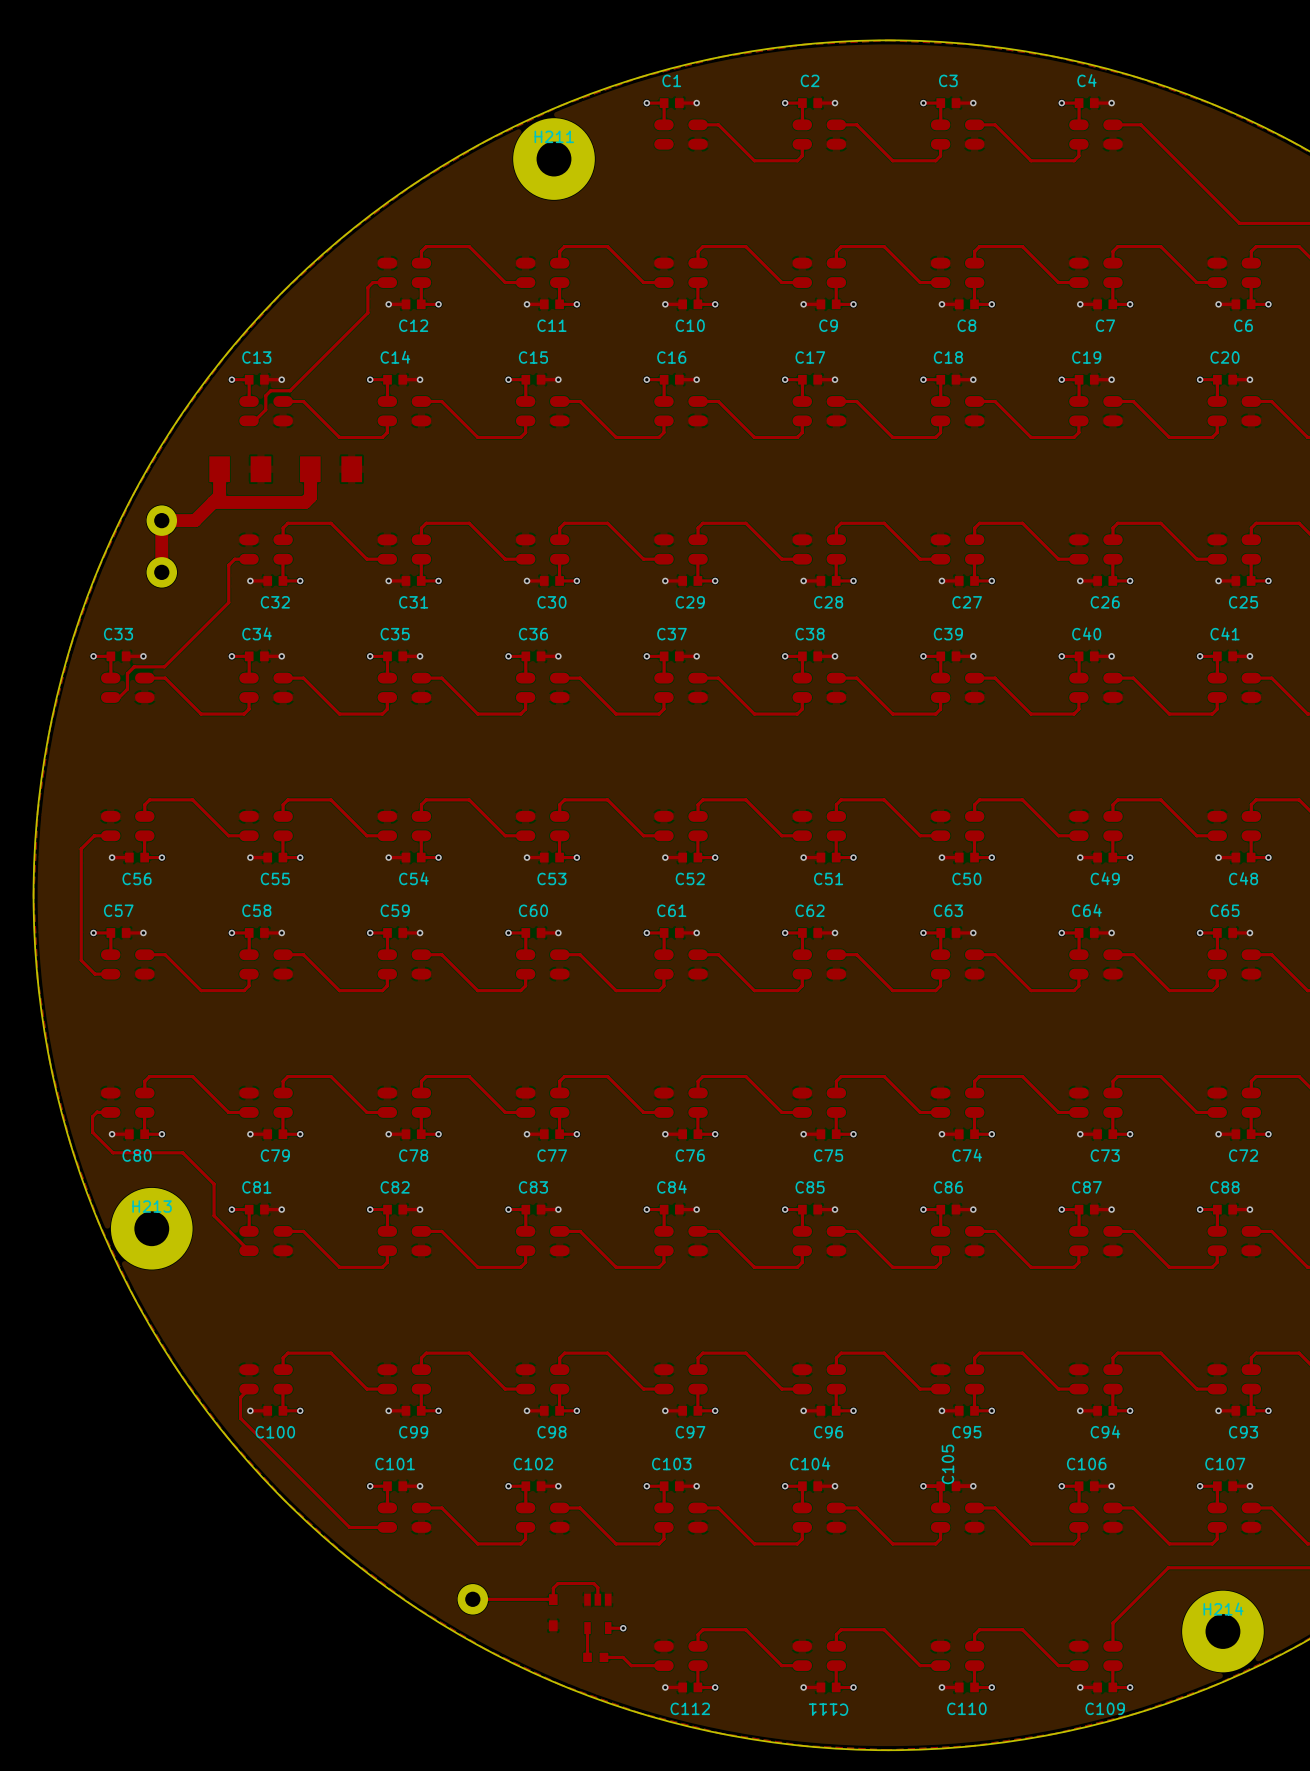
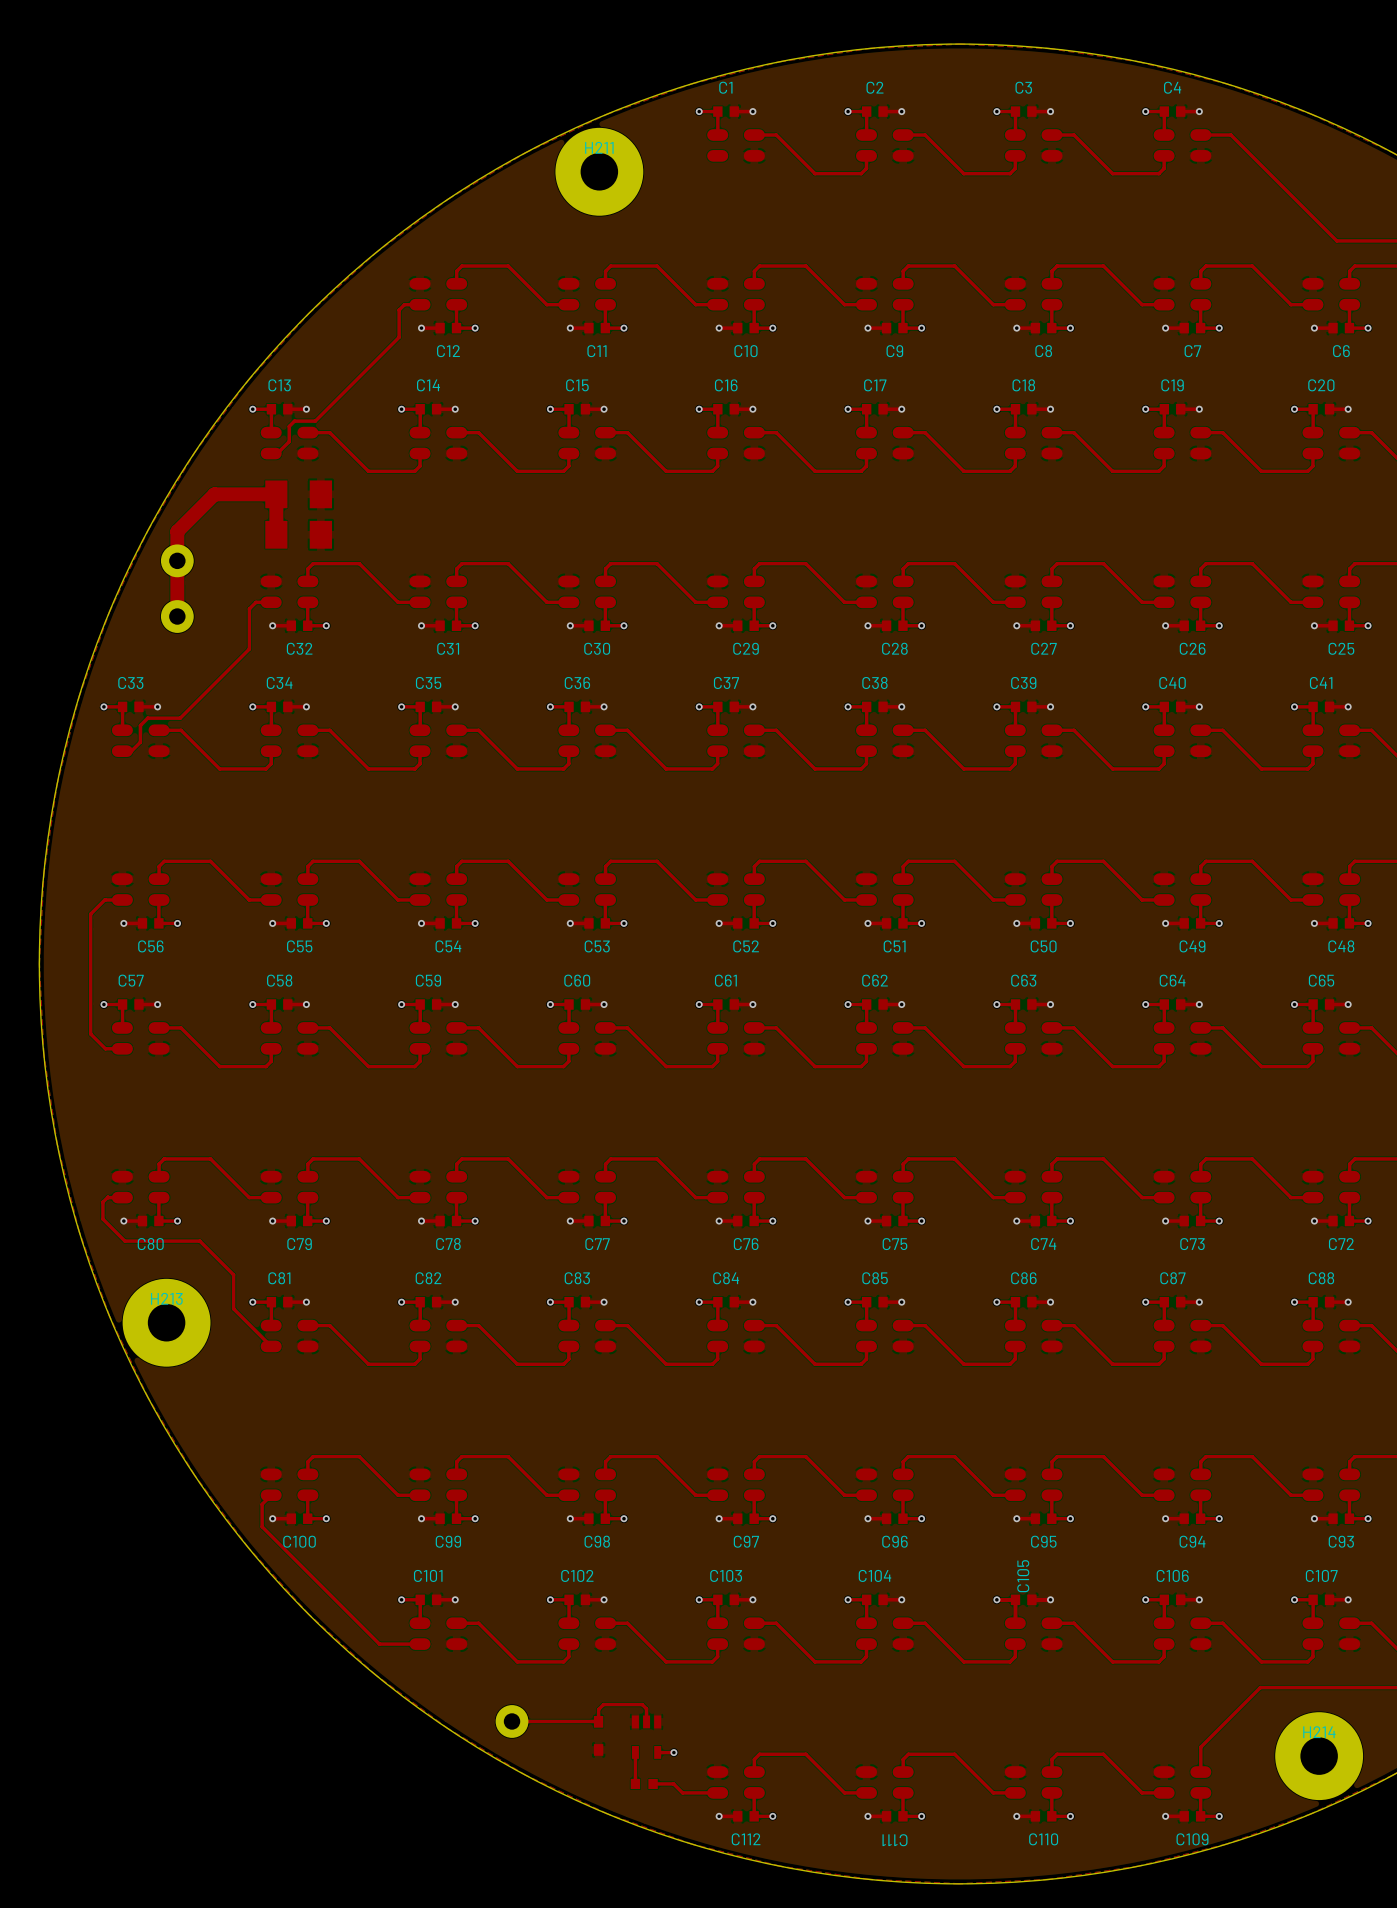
part: none -> (298, 494)
top track: (219, 469) (219, 496) (195, 520) (161, 520) -> (276, 534) (276, 494) (214, 494) (177, 531) (177, 560)
part: (240, 469) -> none
part: (331, 469) -> none
top track: (310, 476) (310, 496) (305, 502) (213, 502) -> none
part: none -> (298, 534)

